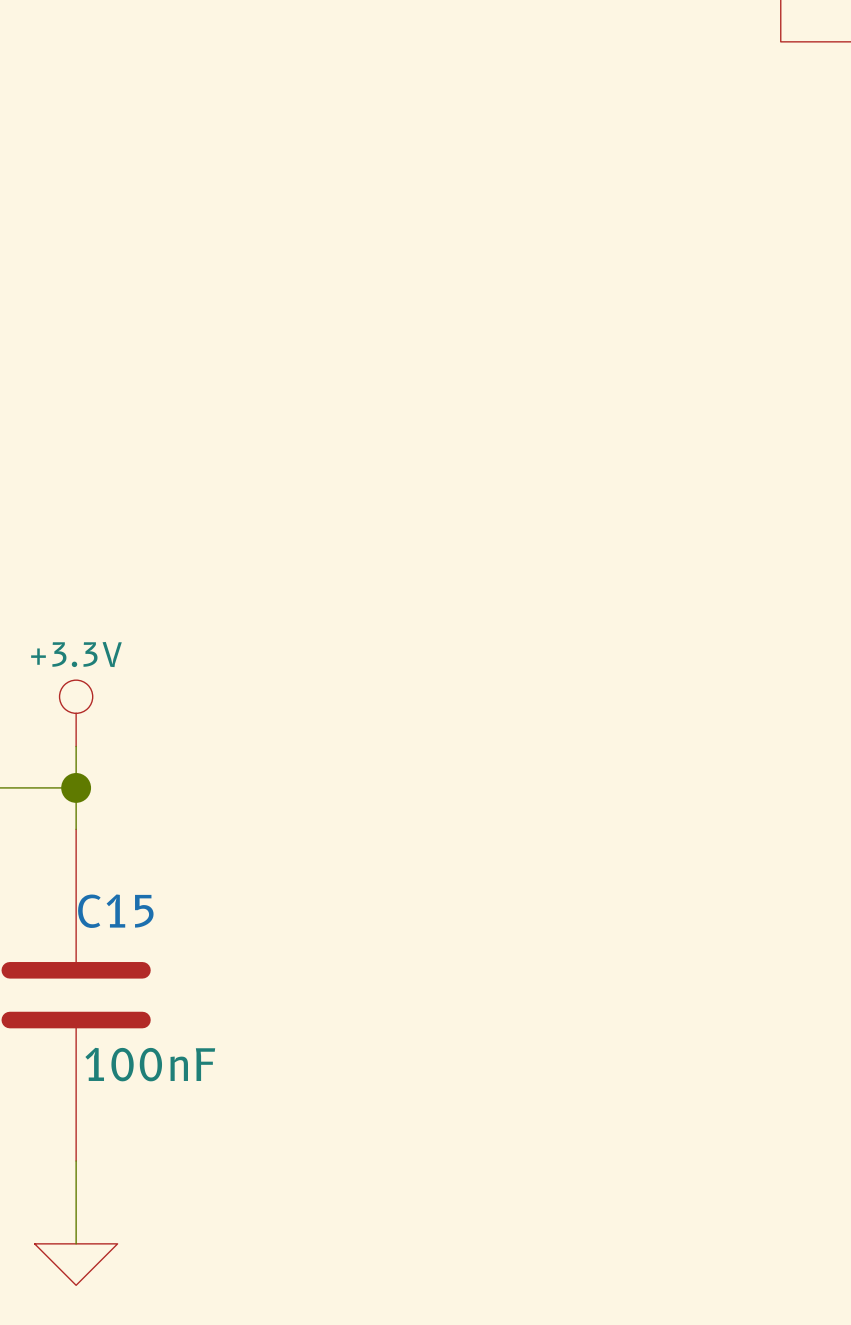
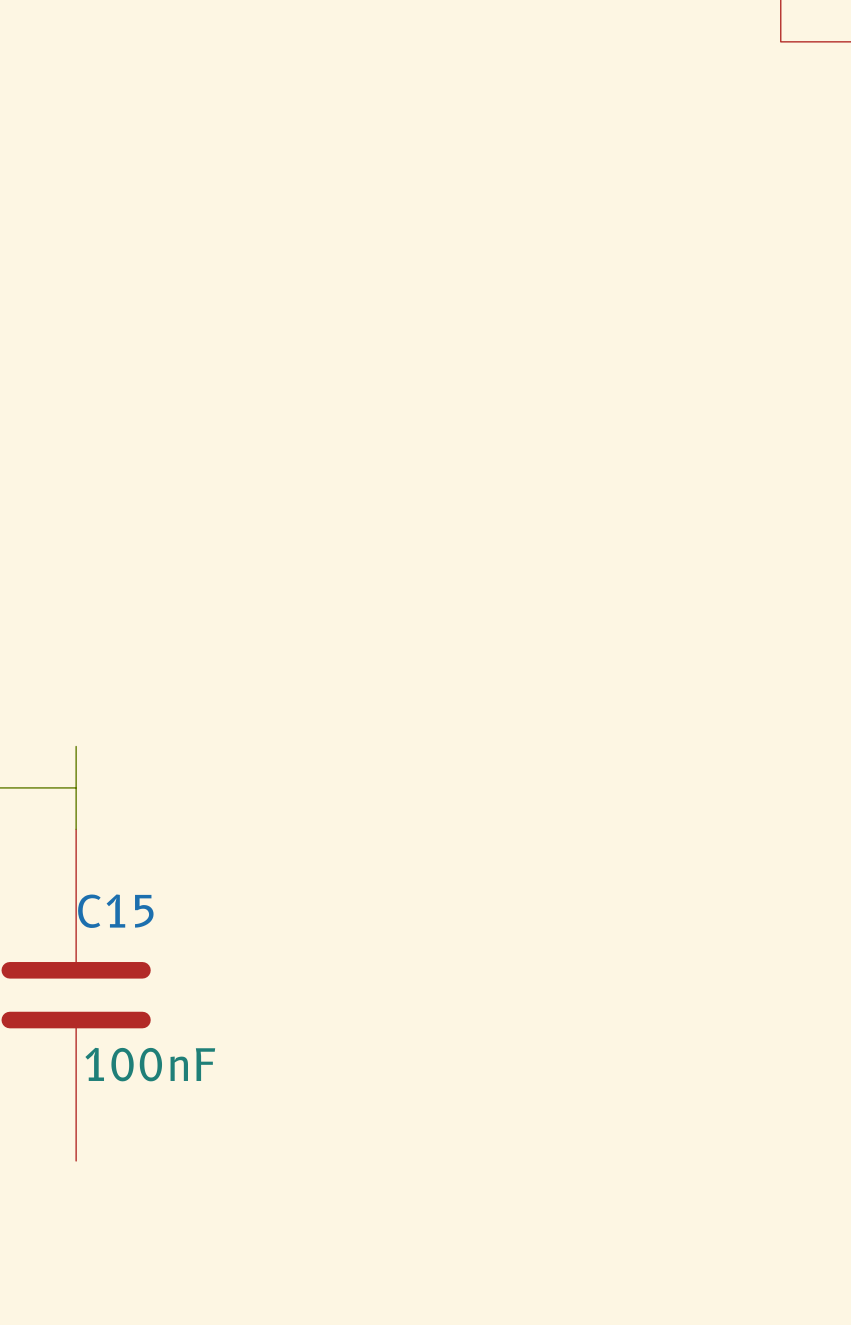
power symbol: +3.3V (76, 713) -> none
junction: (76, 787) -> none
wire: (76, 1160) (76, 1243) -> none
power symbol: (76, 1264) -> none

